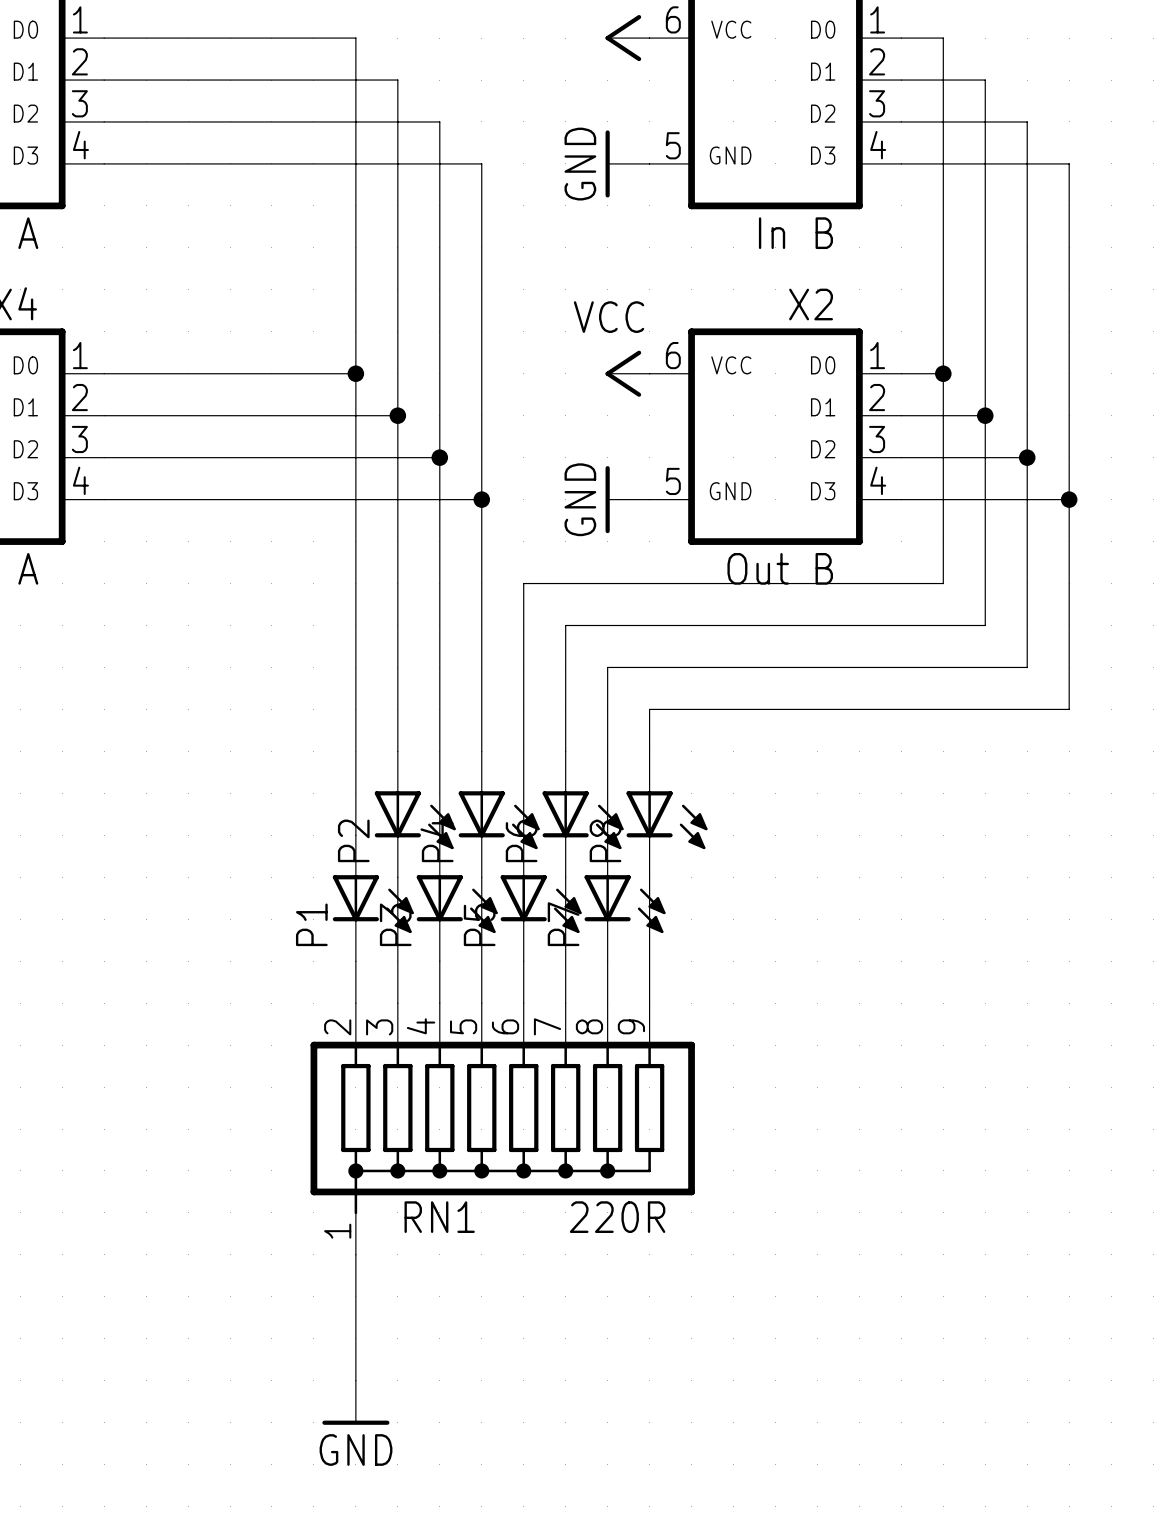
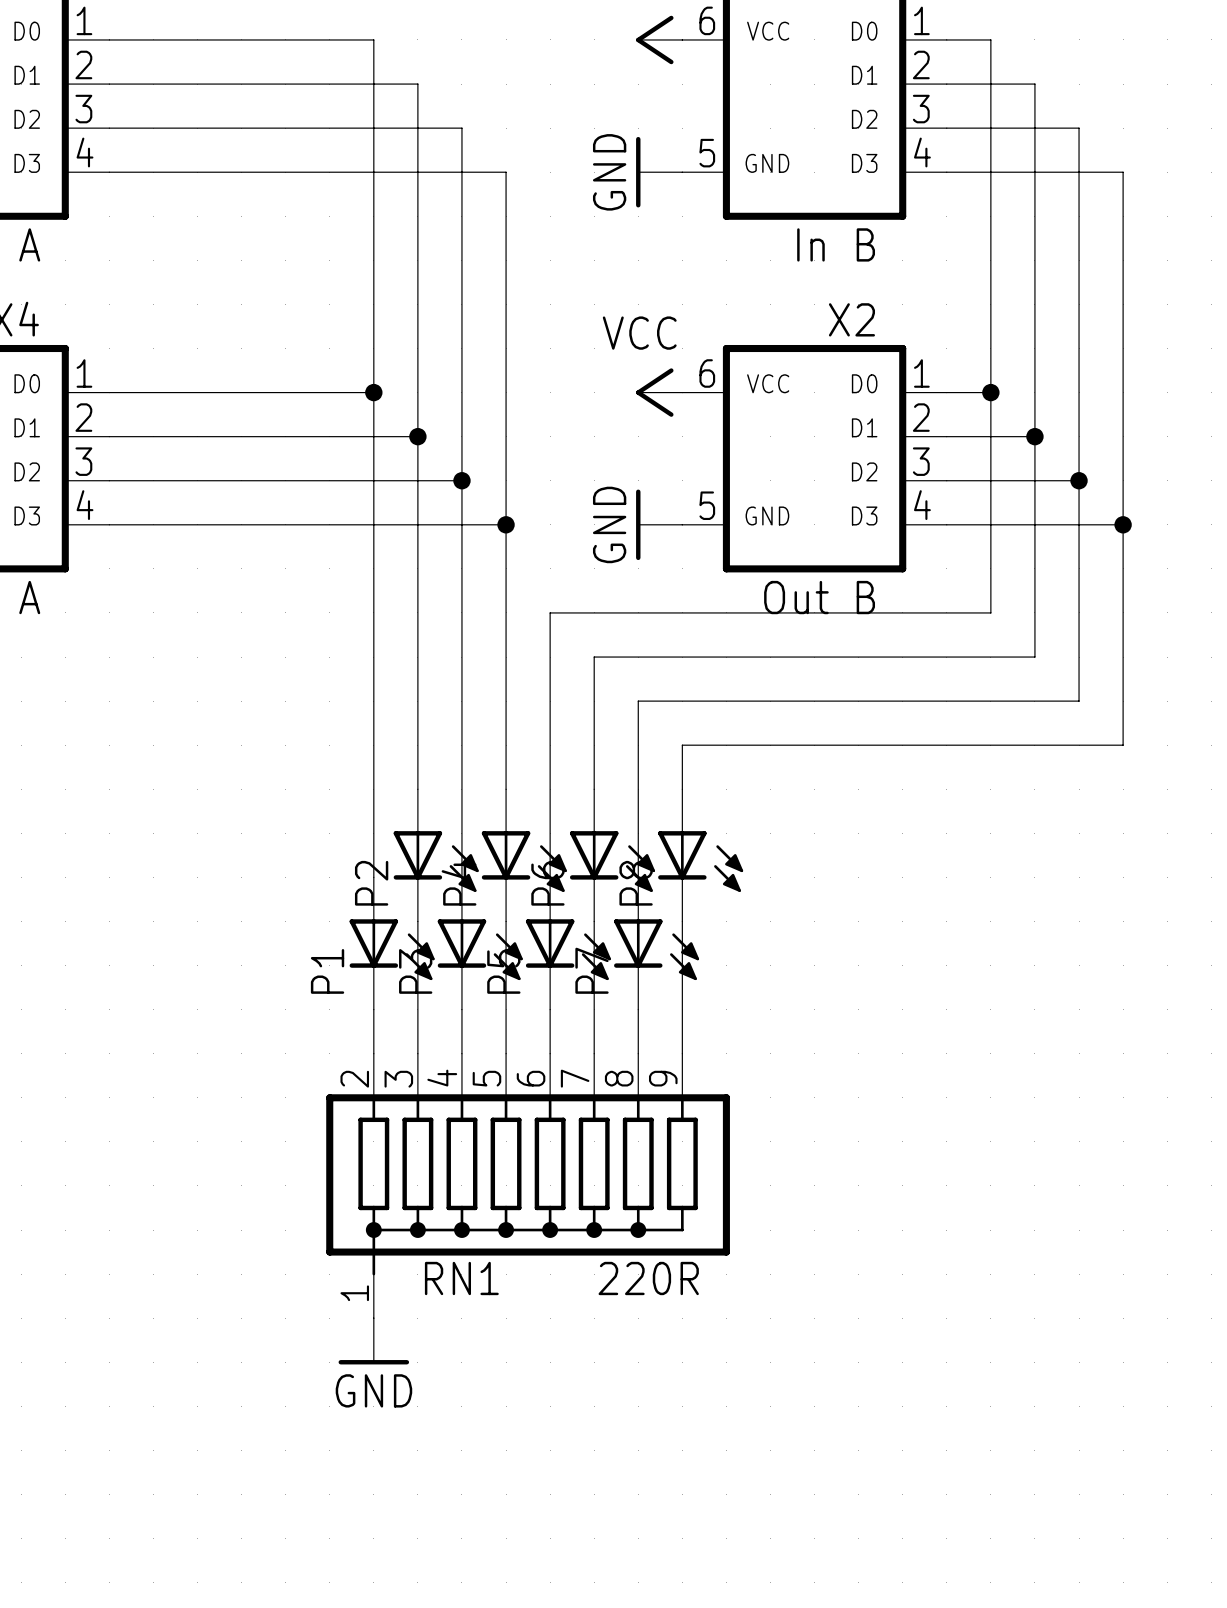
wire: (355, 1254) (355, 1380) -> none
power symbol position: GND (355, 1402) -> GND (373, 1341)

